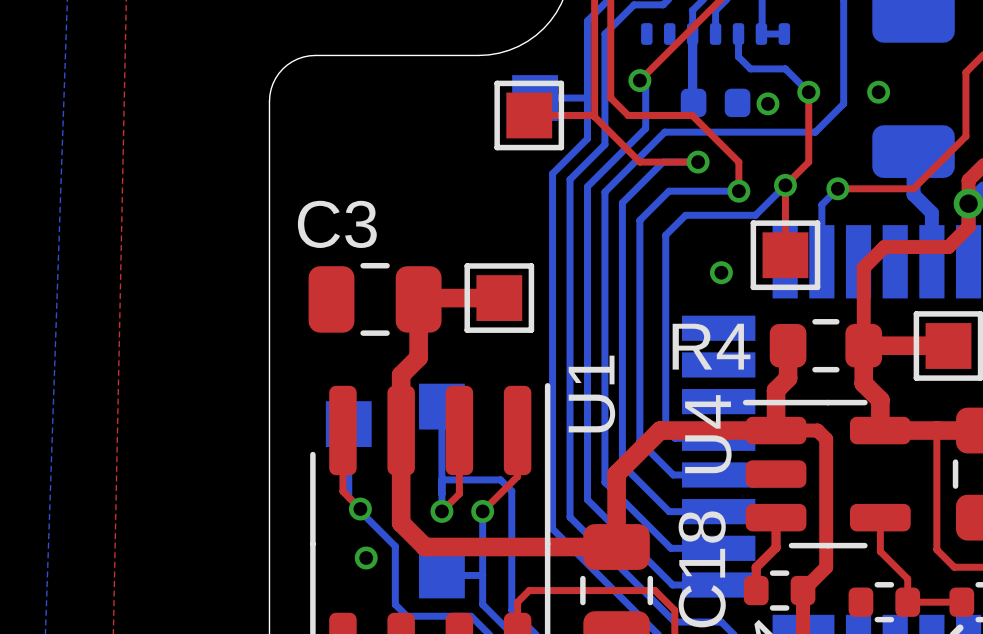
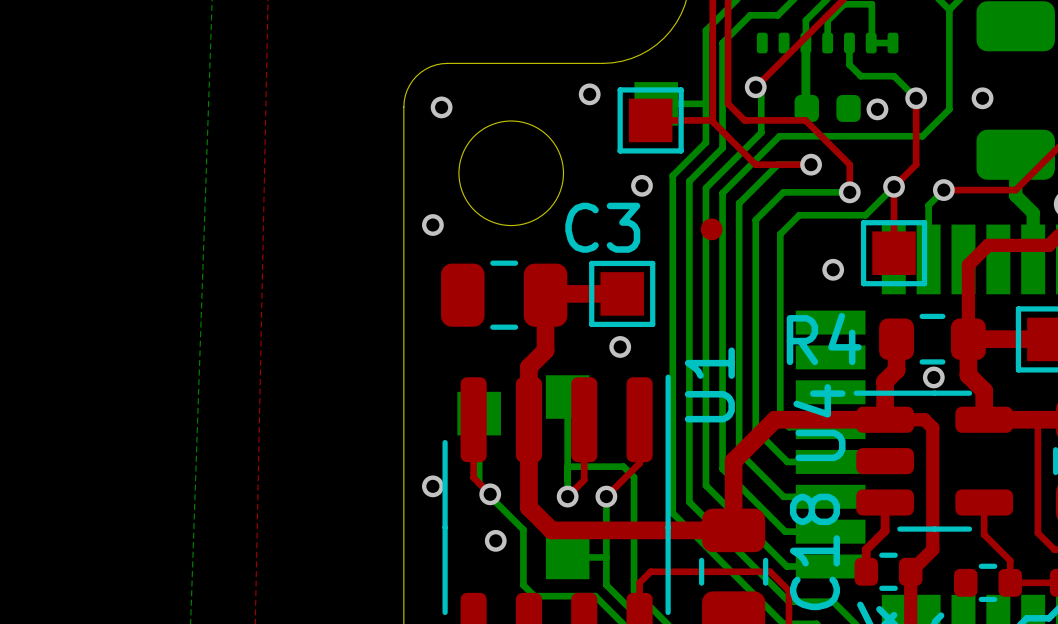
via: none -> (589, 94)
via: none -> (441, 107)
round board edge: none -> [458, 120, 564, 226]
via: none -> (641, 185)
C3 name position: C3 (337, 224) -> C3 (602, 227)
via: none -> (432, 225)
part: none -> (711, 229)
via: none -> (620, 346)
via: none -> (933, 377)
via: none -> (432, 486)

